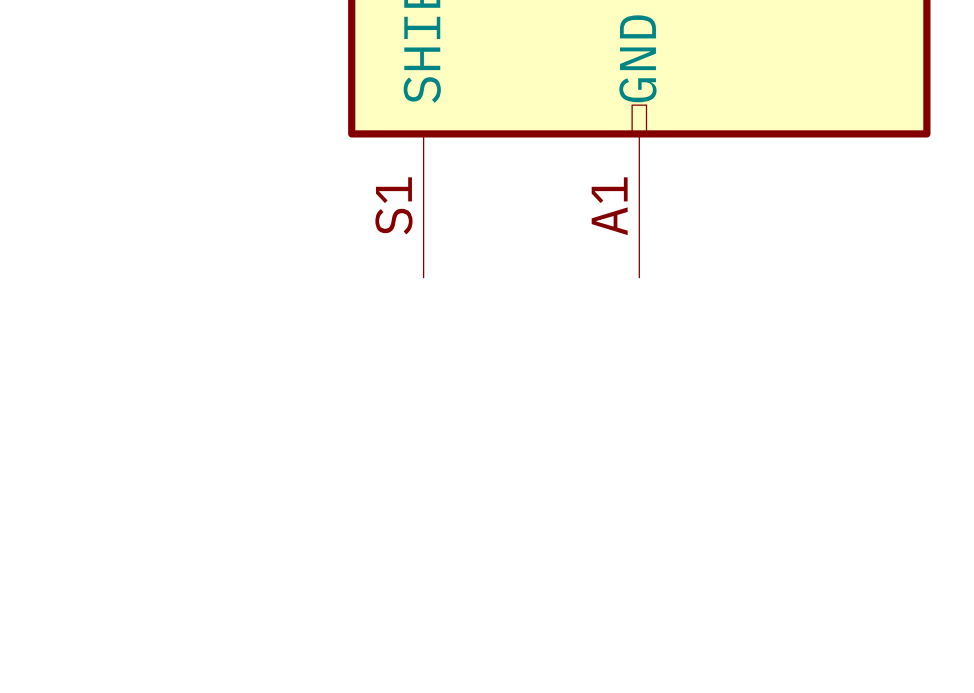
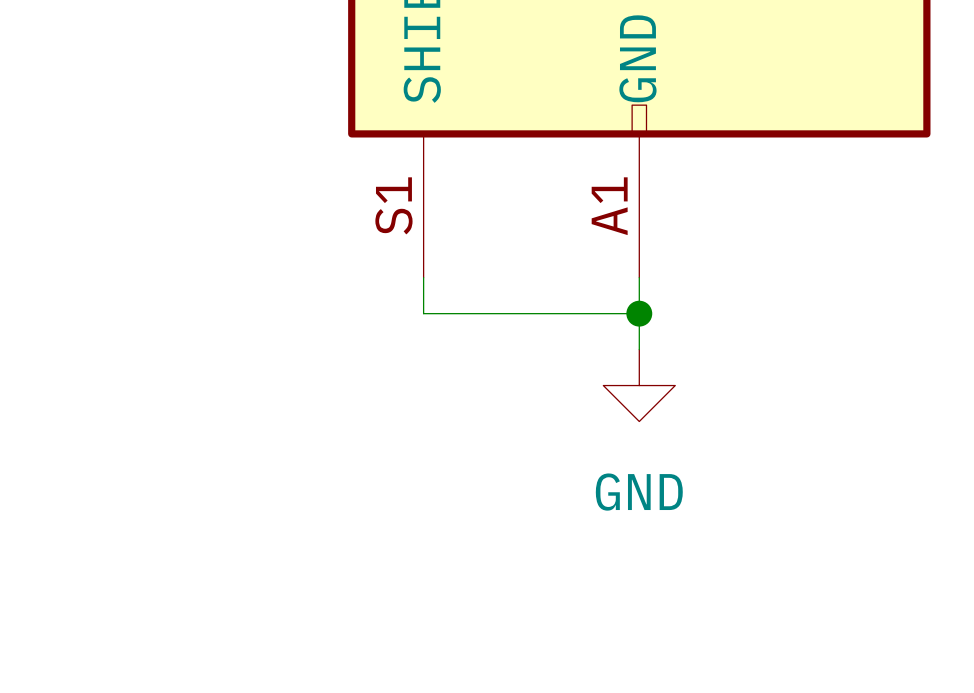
wire: none -> (423, 277) (423, 313) (639, 313)
wire: none -> (639, 277) (639, 349)
junction: none -> (639, 313)
power symbol: none -> GND (639, 385)

